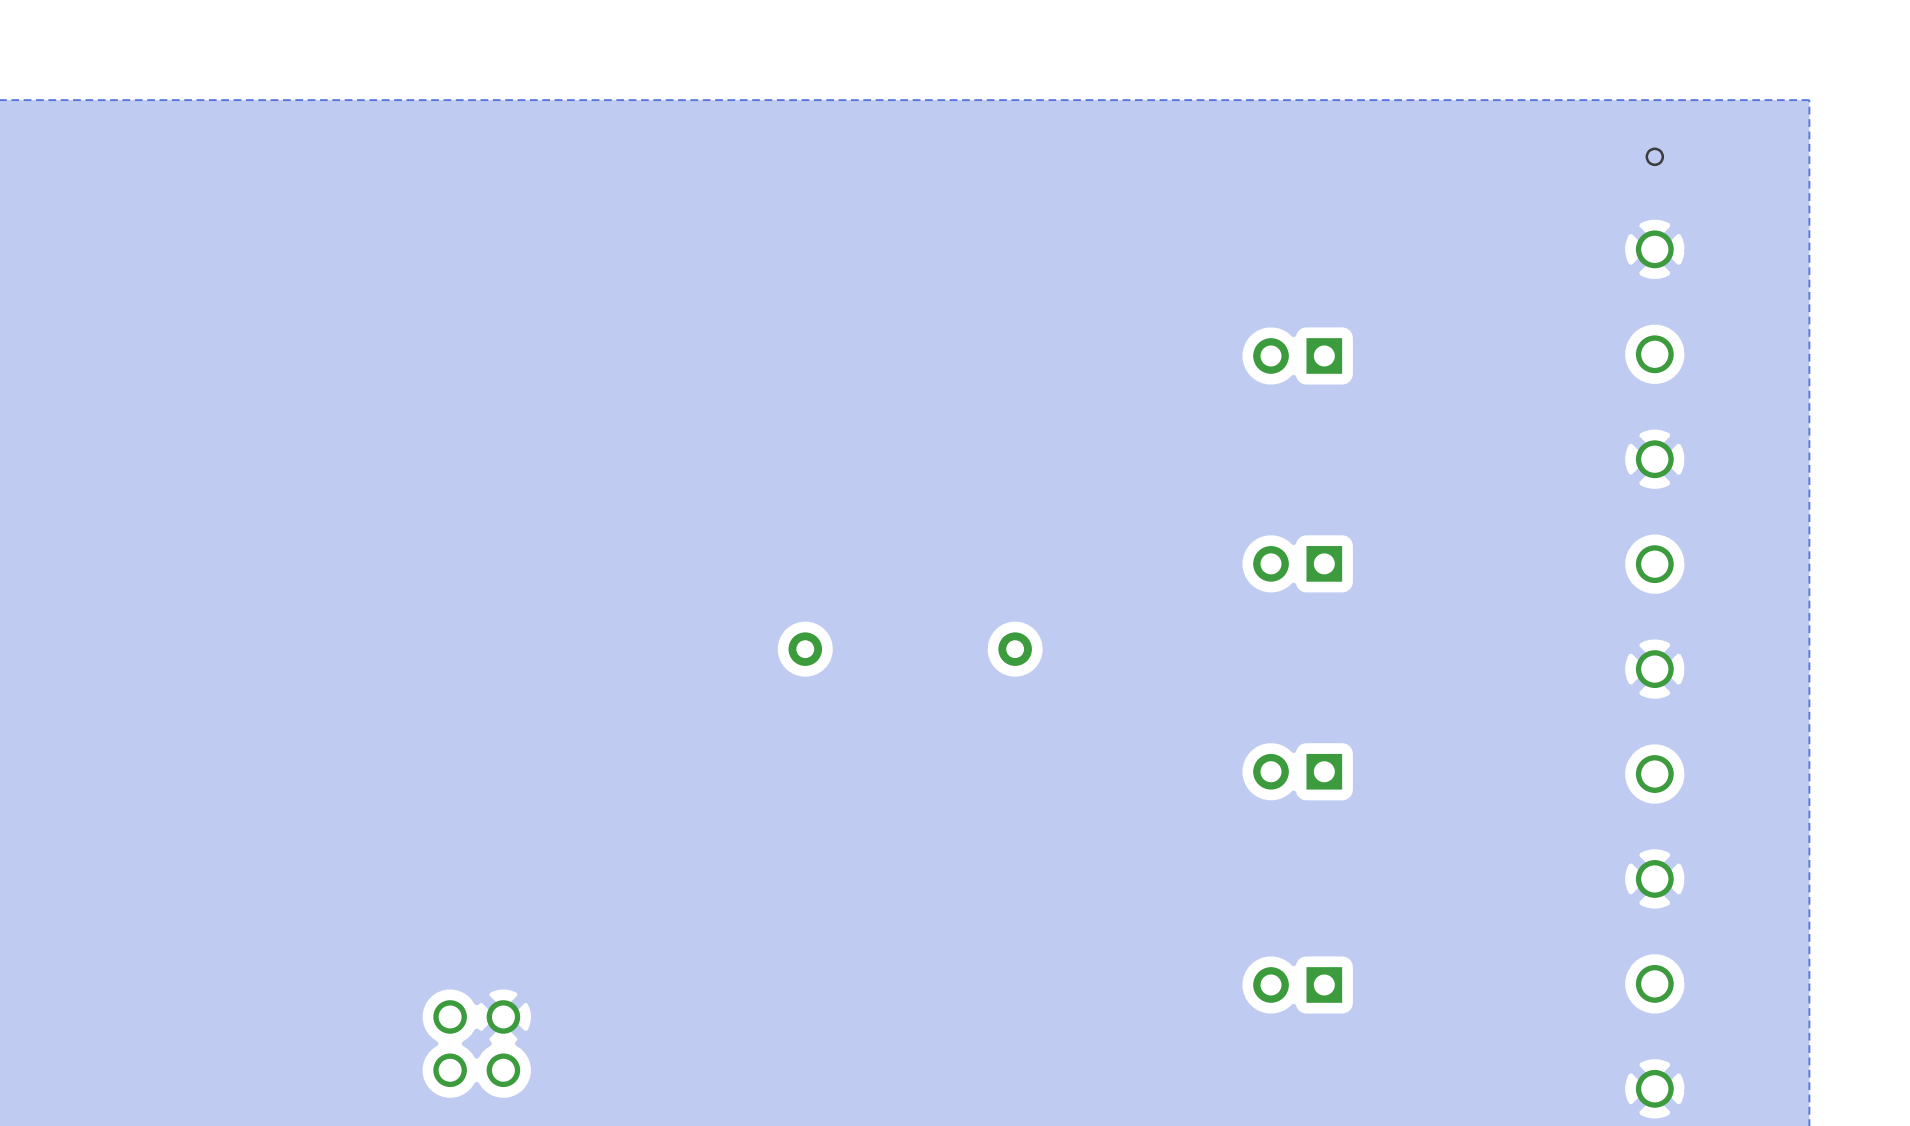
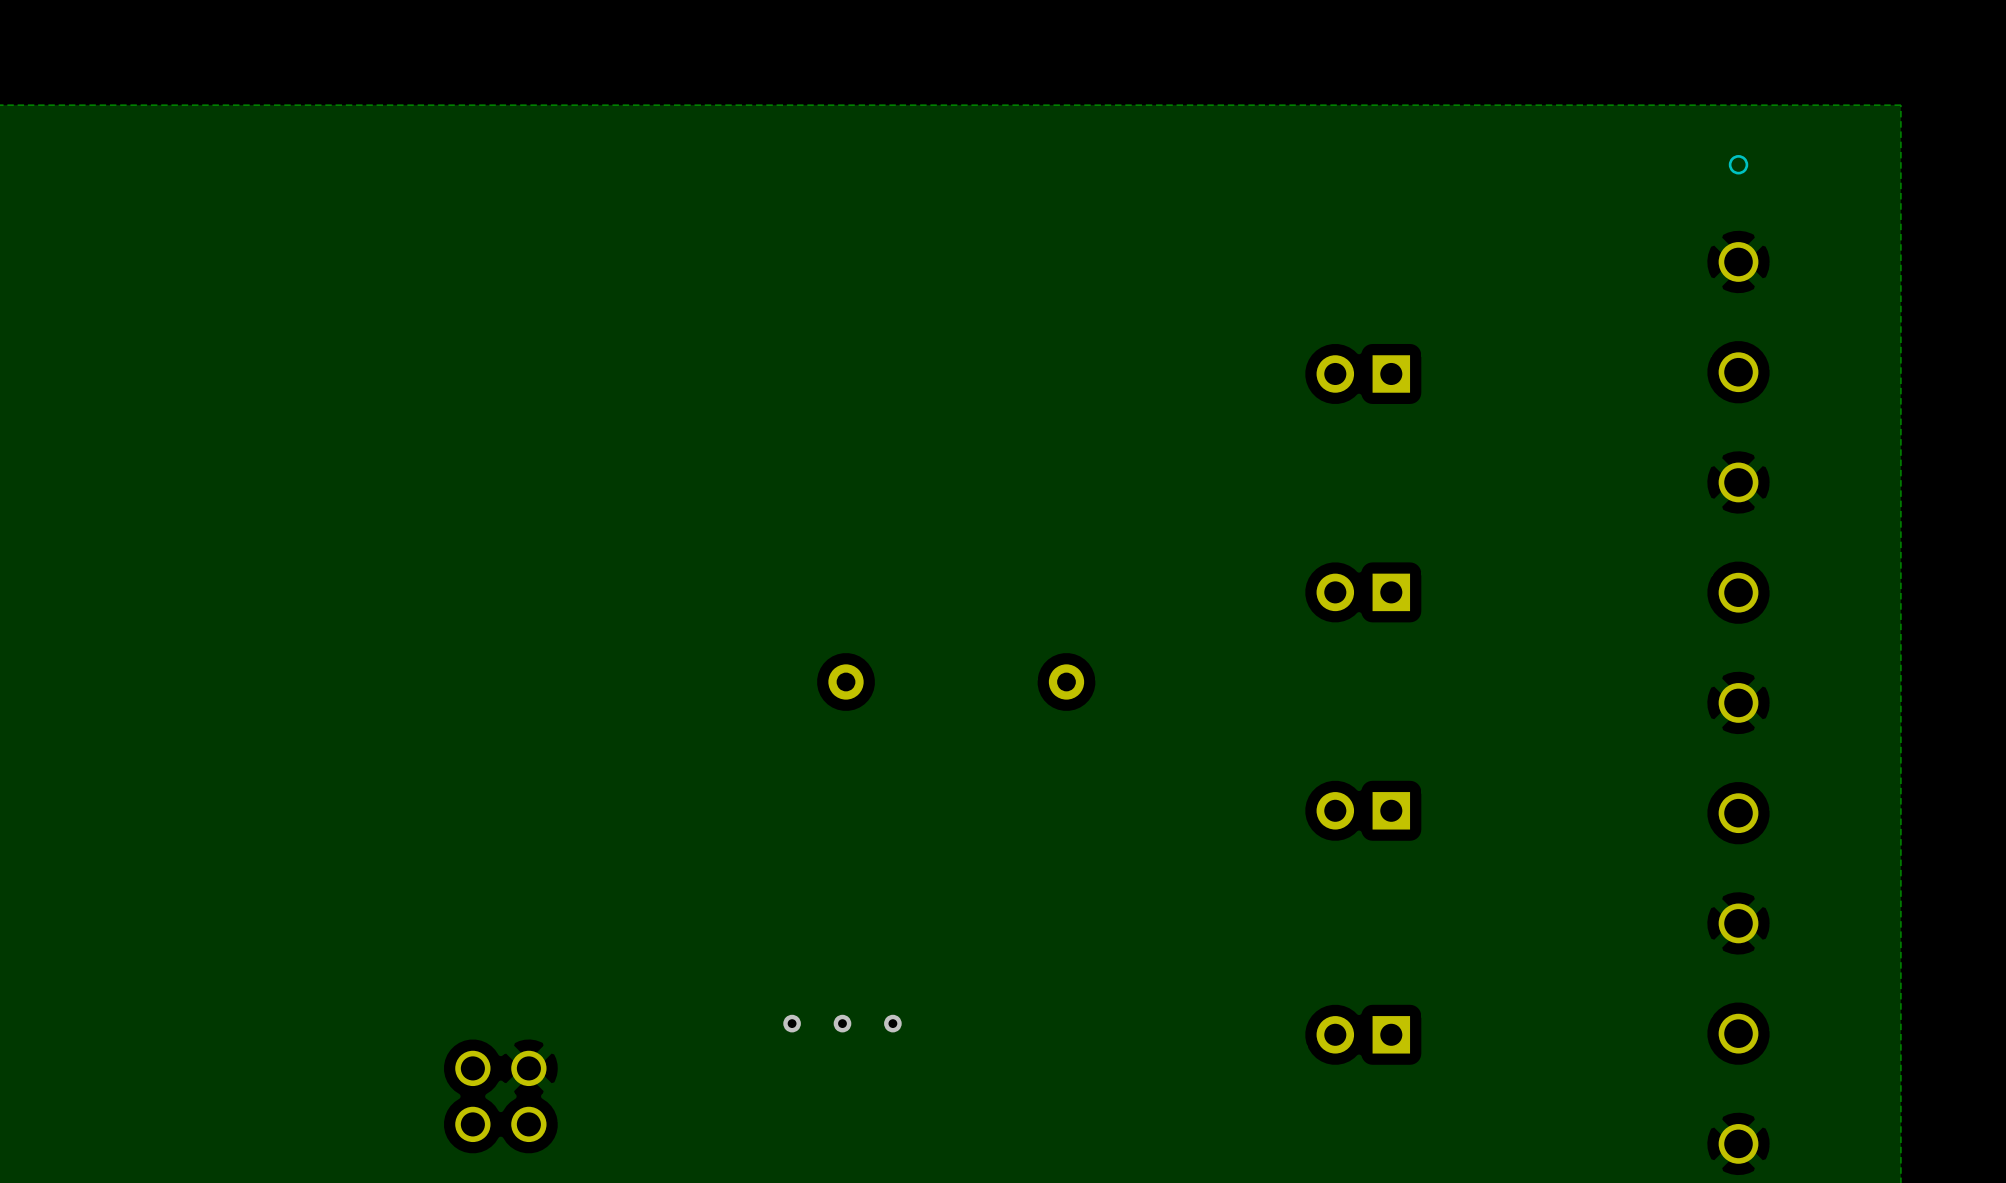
via: none -> (792, 1023)
via: none -> (842, 1023)
via: none -> (892, 1023)

